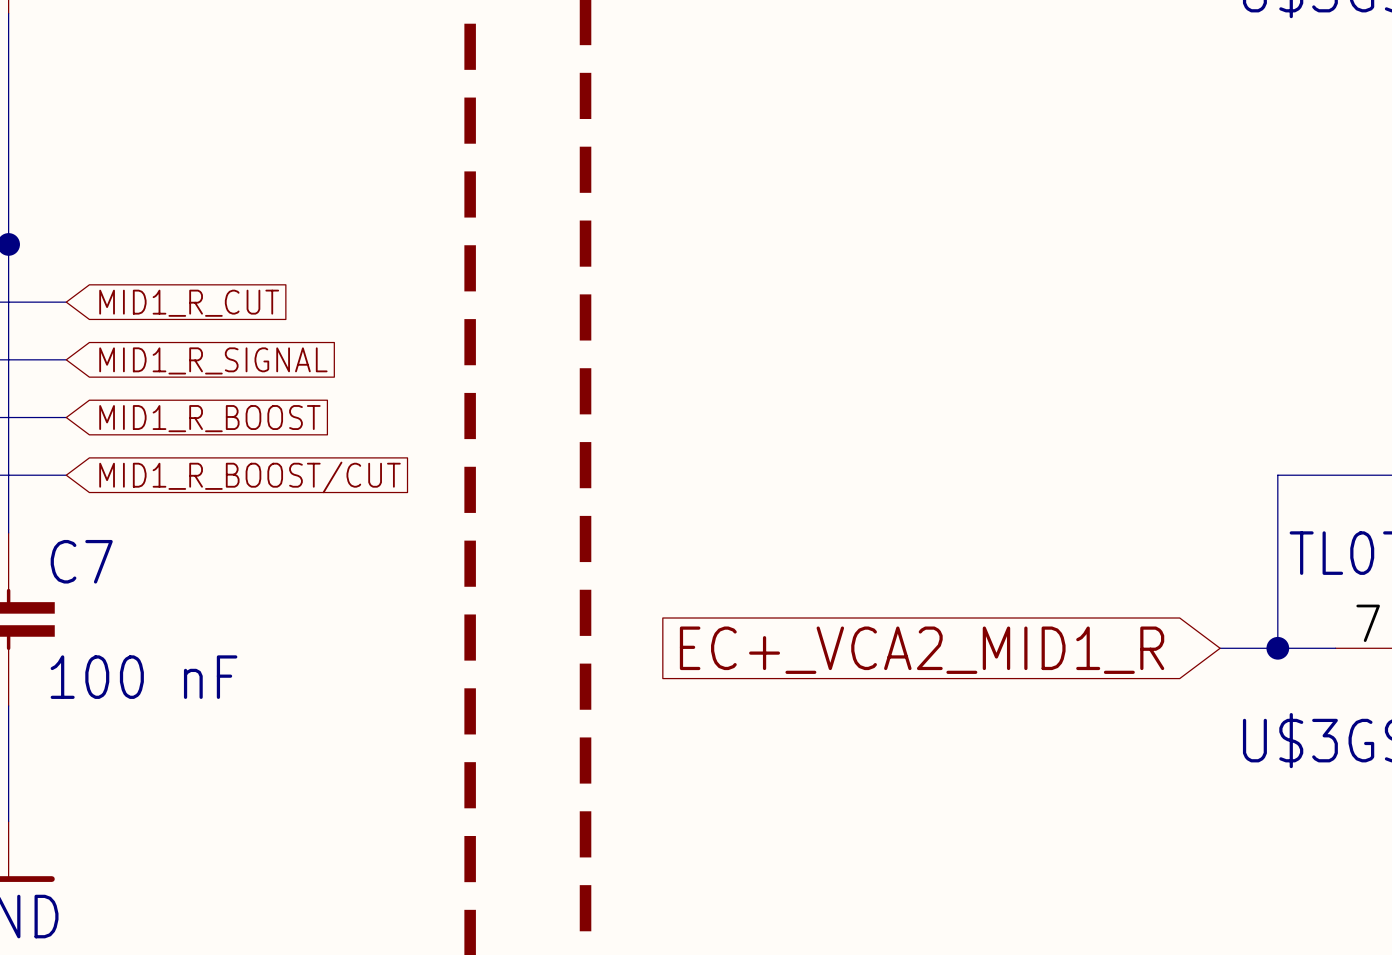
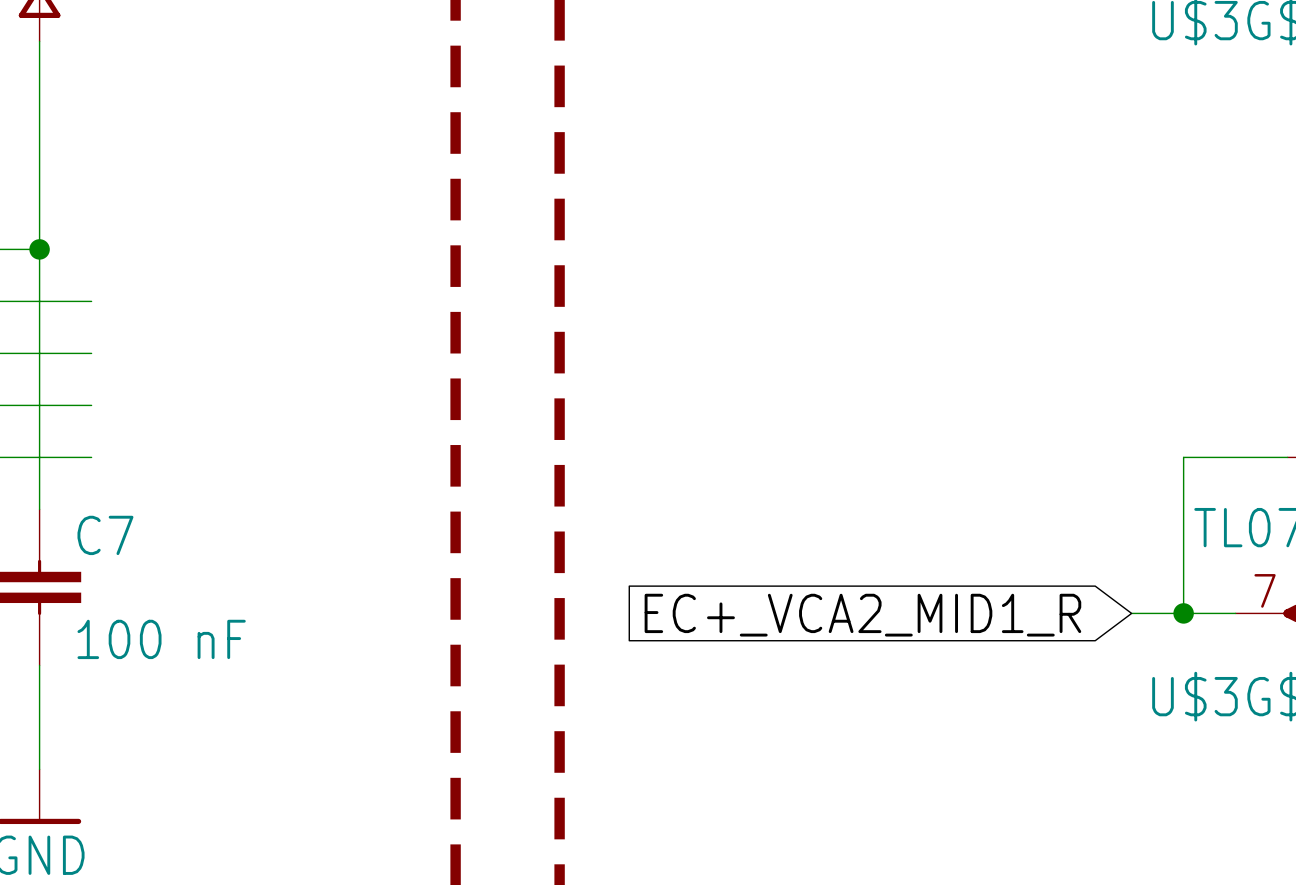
global label: MID1_R_CUT (189, 303) -> none
global label: MID1_R_SIGNAL (213, 360) -> none
global label: MID1_R_BOOST (209, 418) -> none
global label: MID1_R_BOOST/CUT (249, 477) -> none

